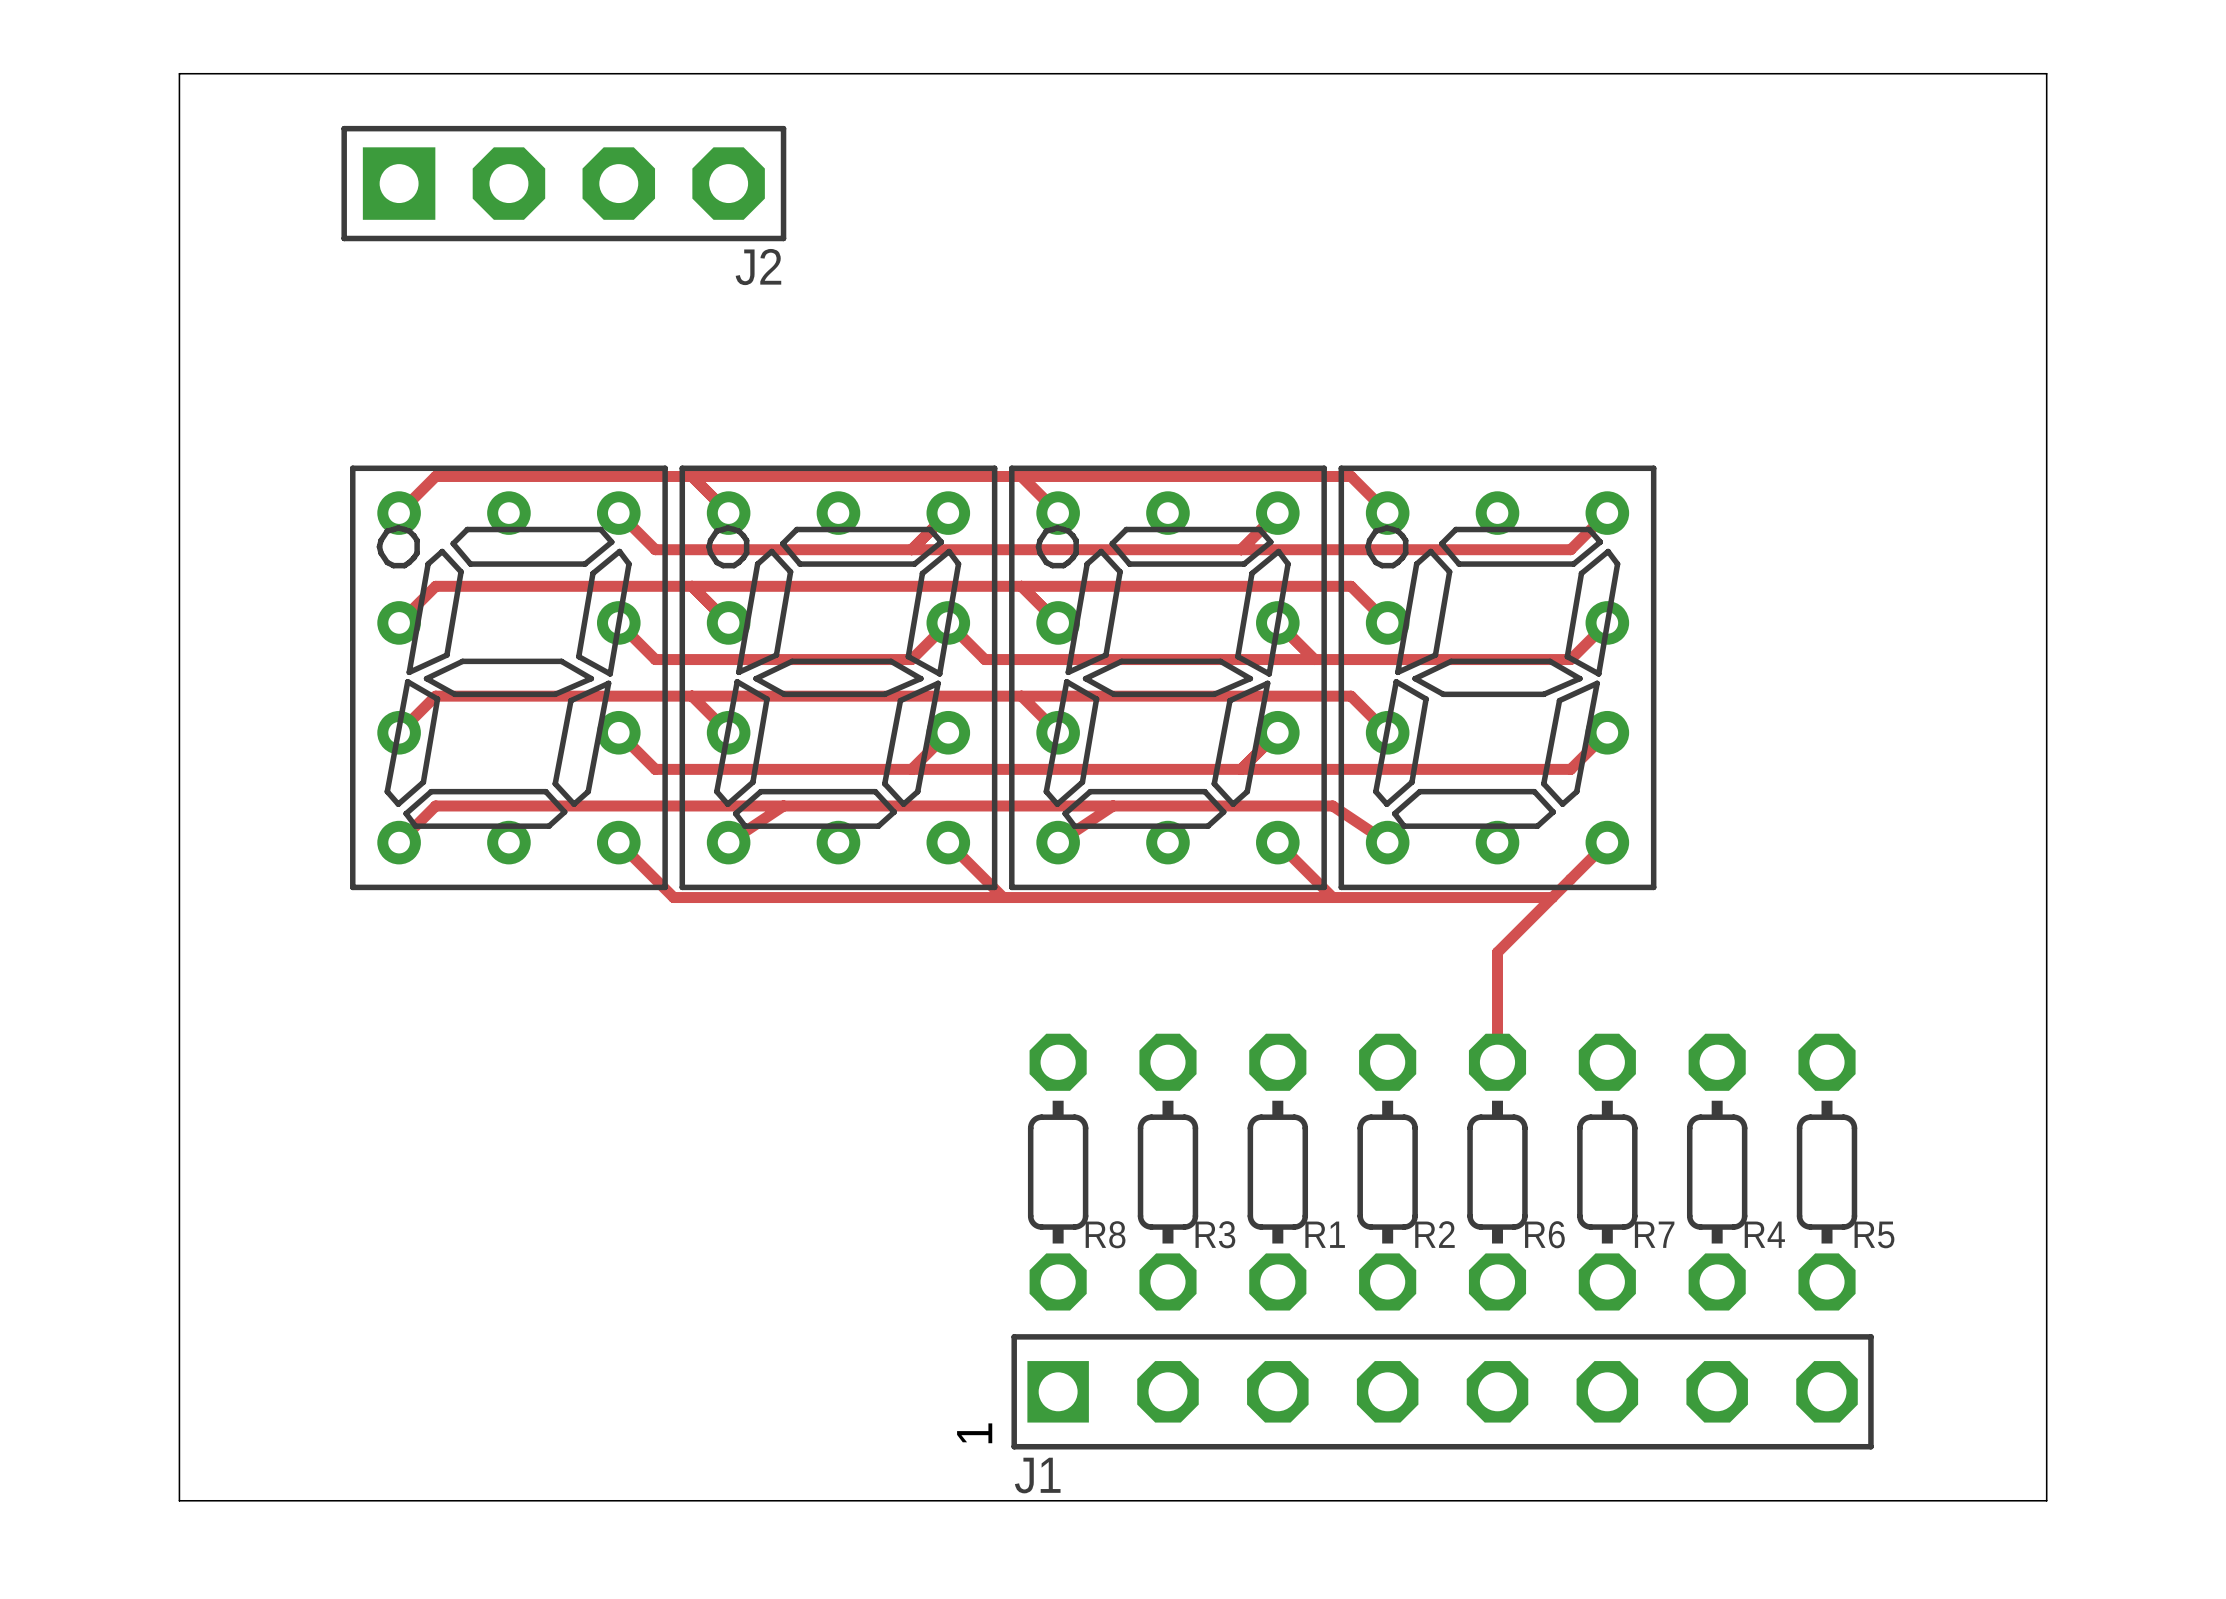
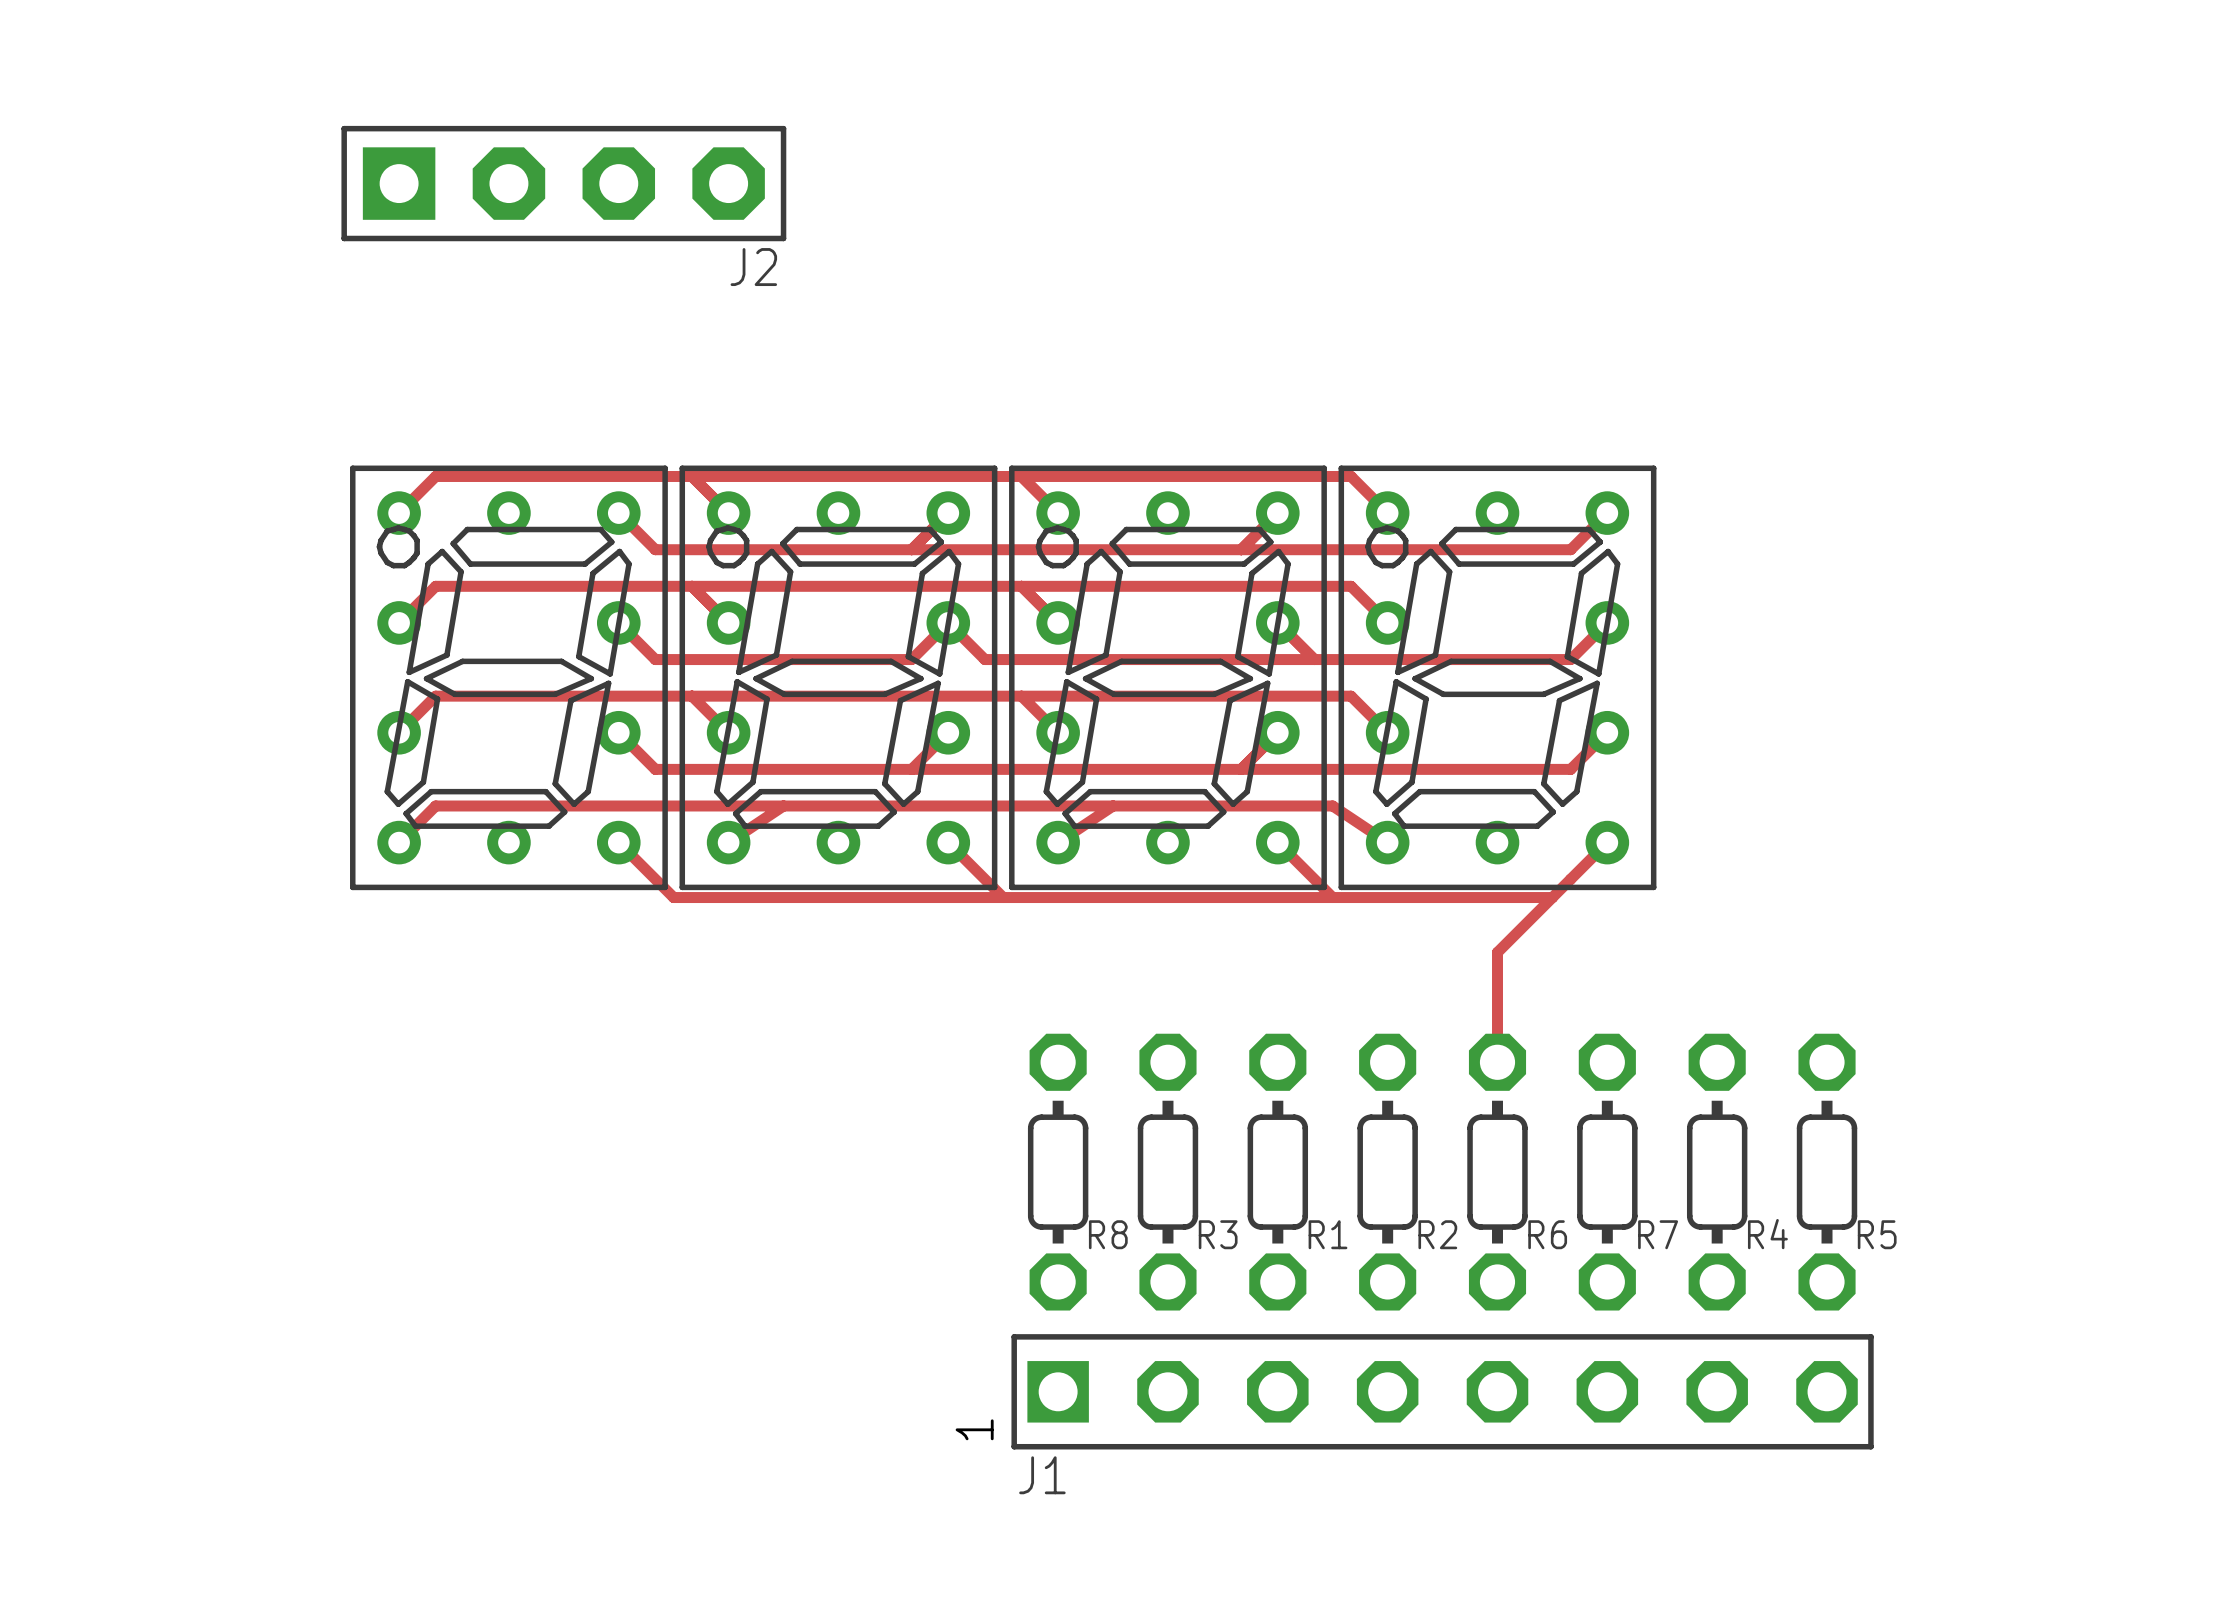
board edge: (179, 73) (179, 1500) (2046, 1500) (2046, 73) (179, 73) -> none

